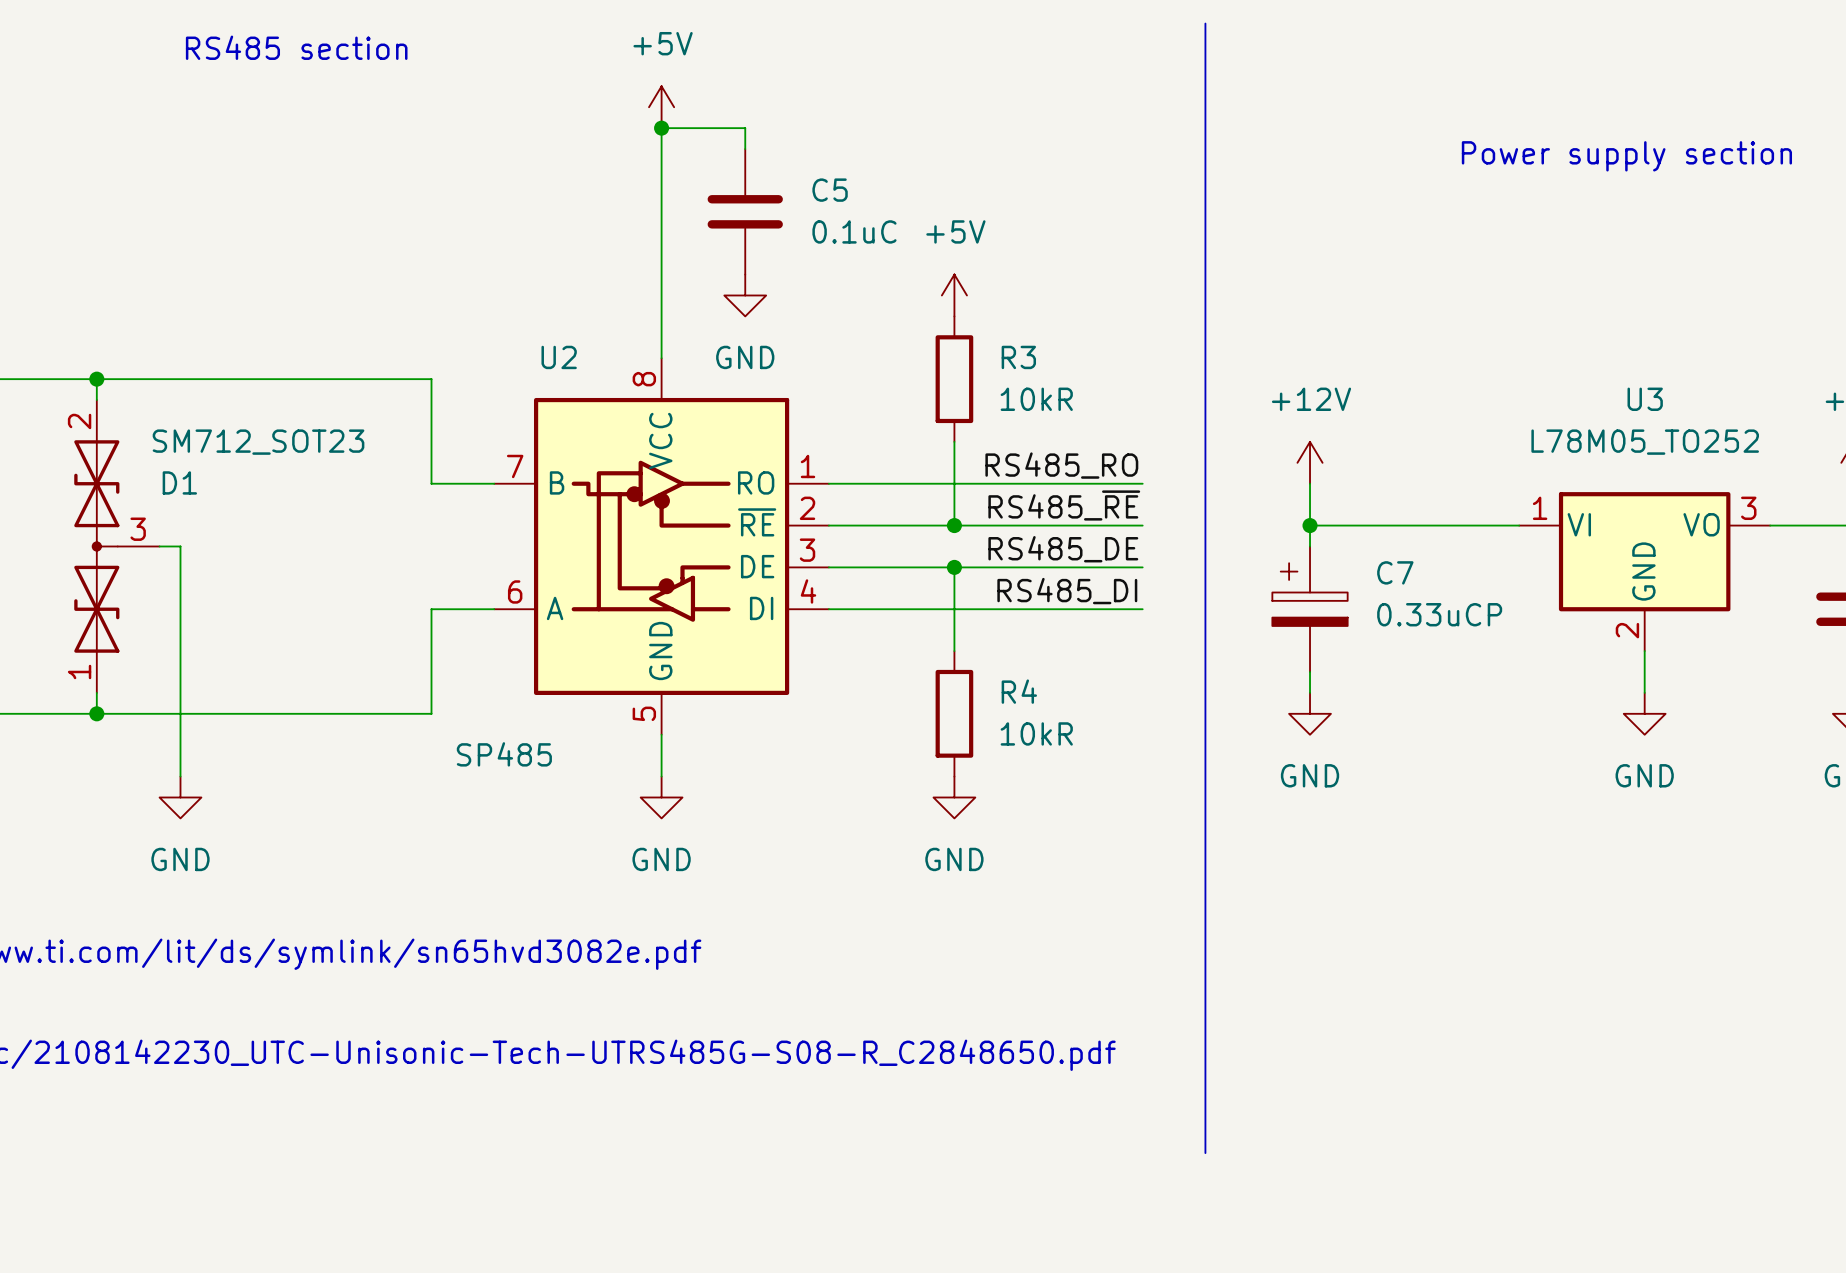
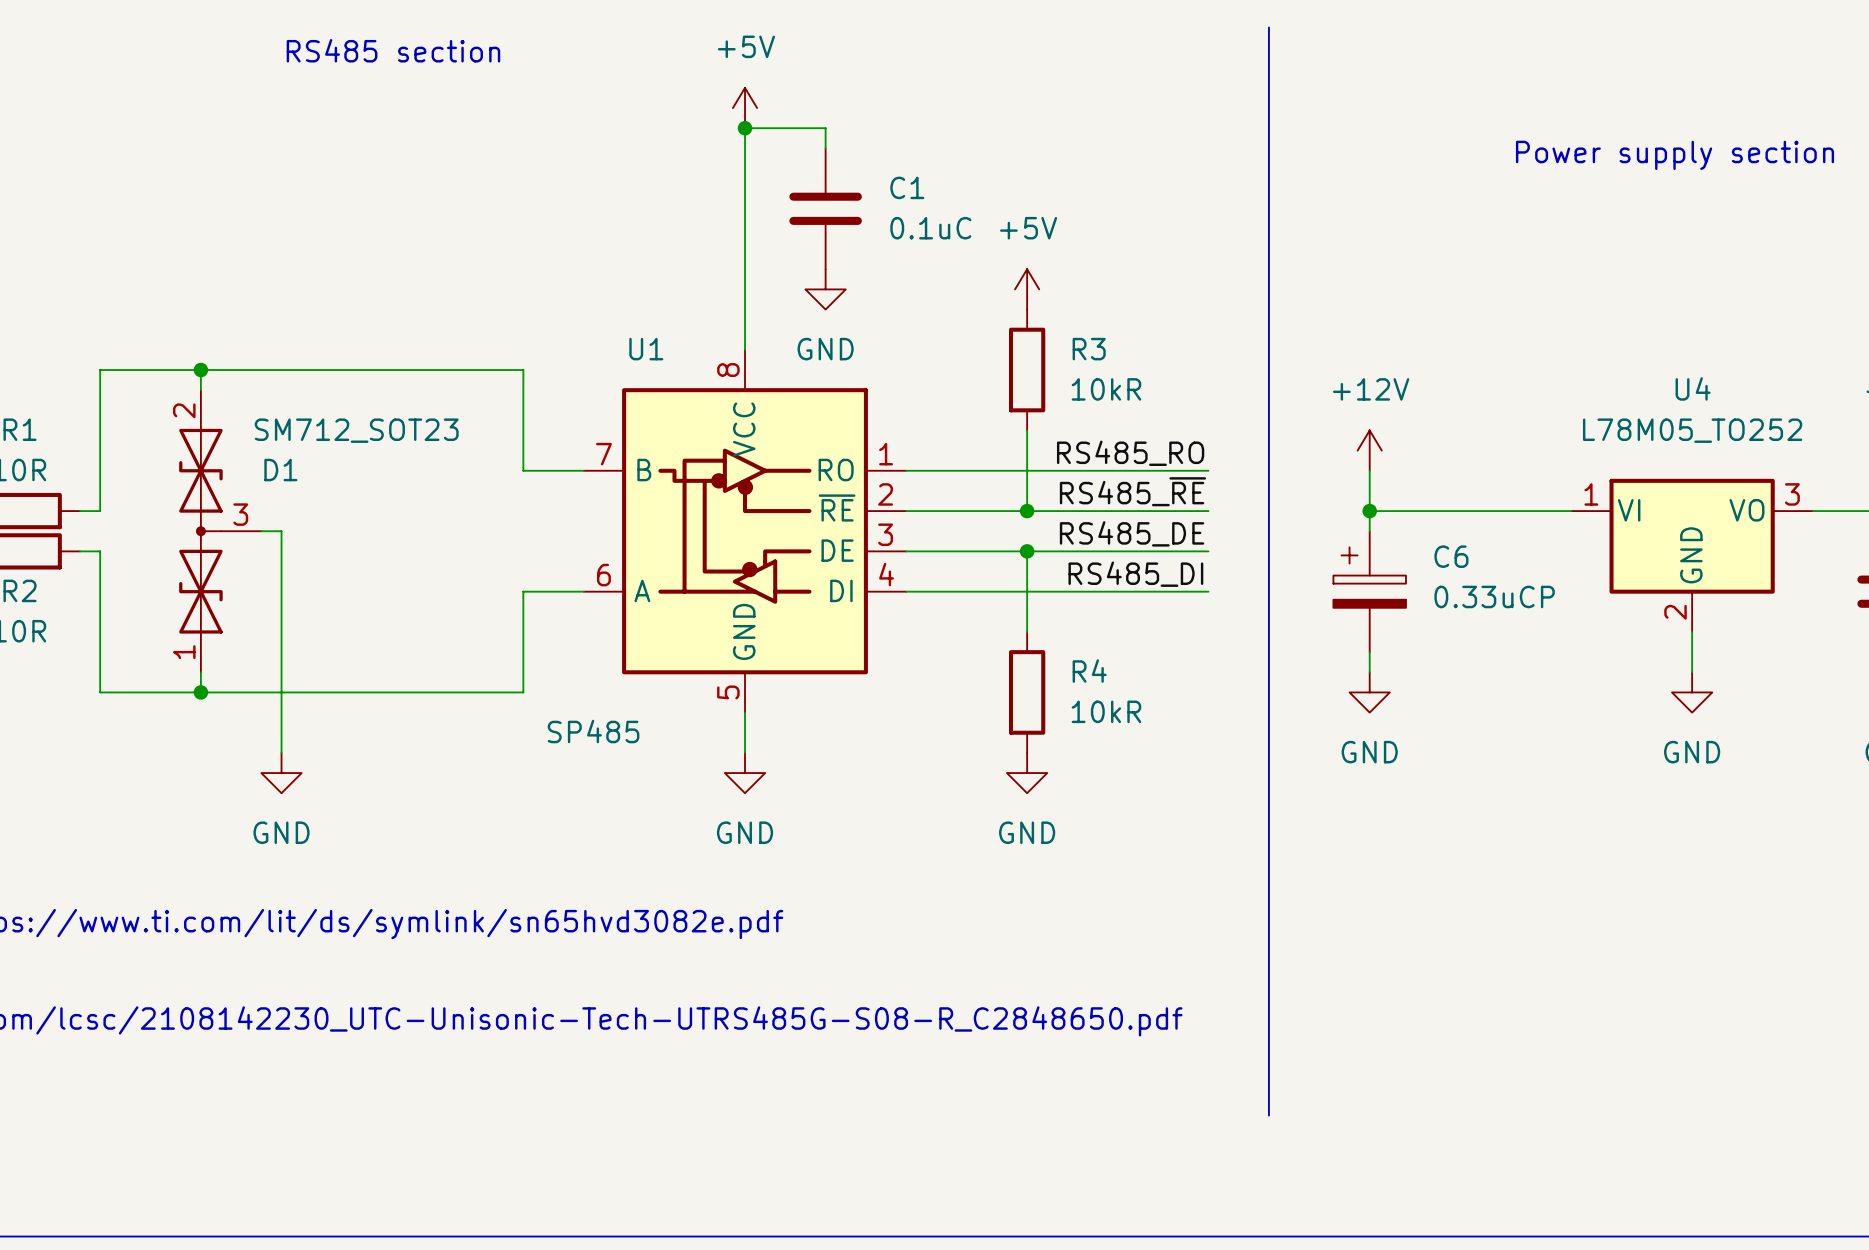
C5 name: C5 (830, 190) -> C1 (907, 187)
U2 name: U2 (559, 357) -> U1 (646, 349)
U3 name: U3 (1645, 399) -> U4 (1693, 388)
C7 name: C7 (1395, 572) -> C6 (1451, 556)

